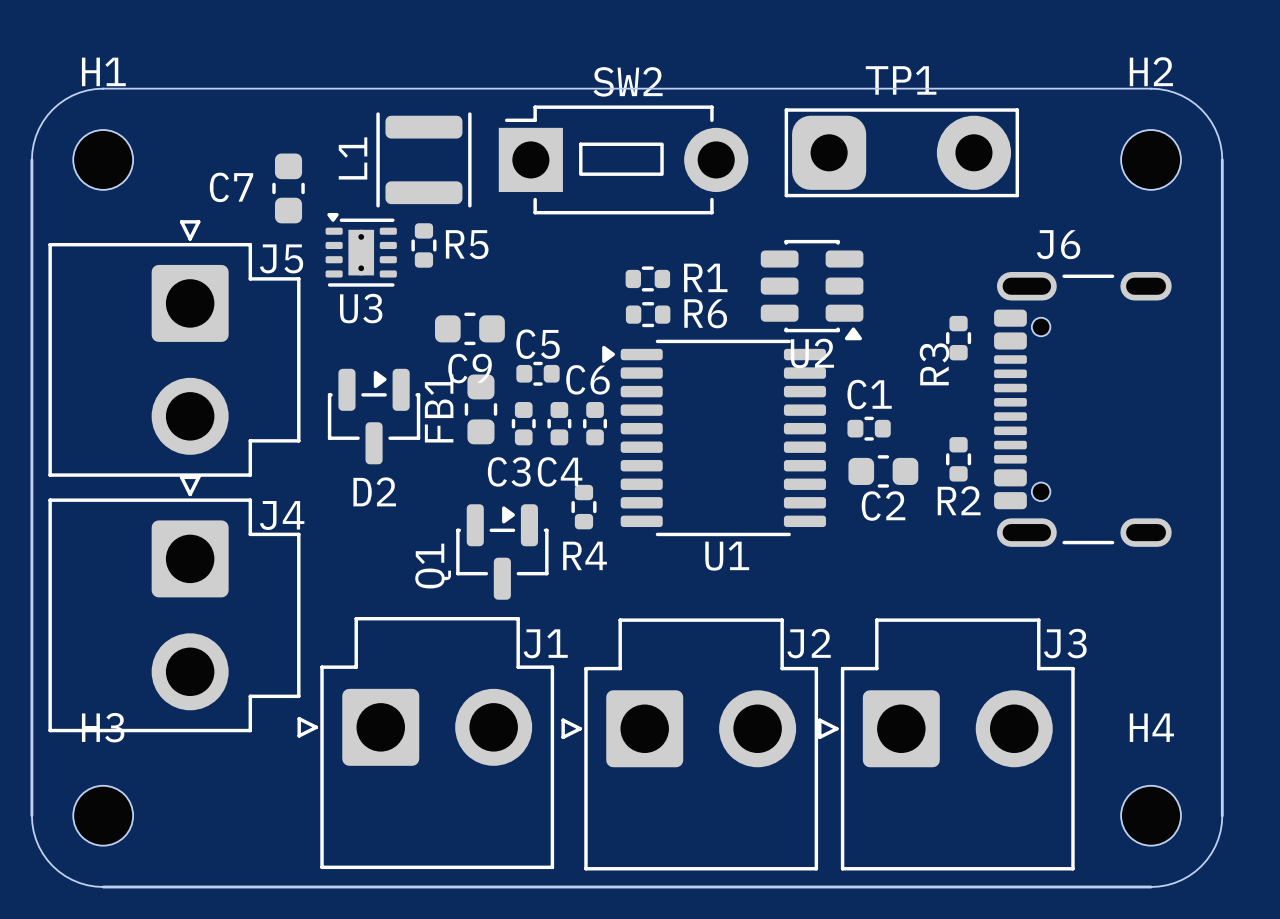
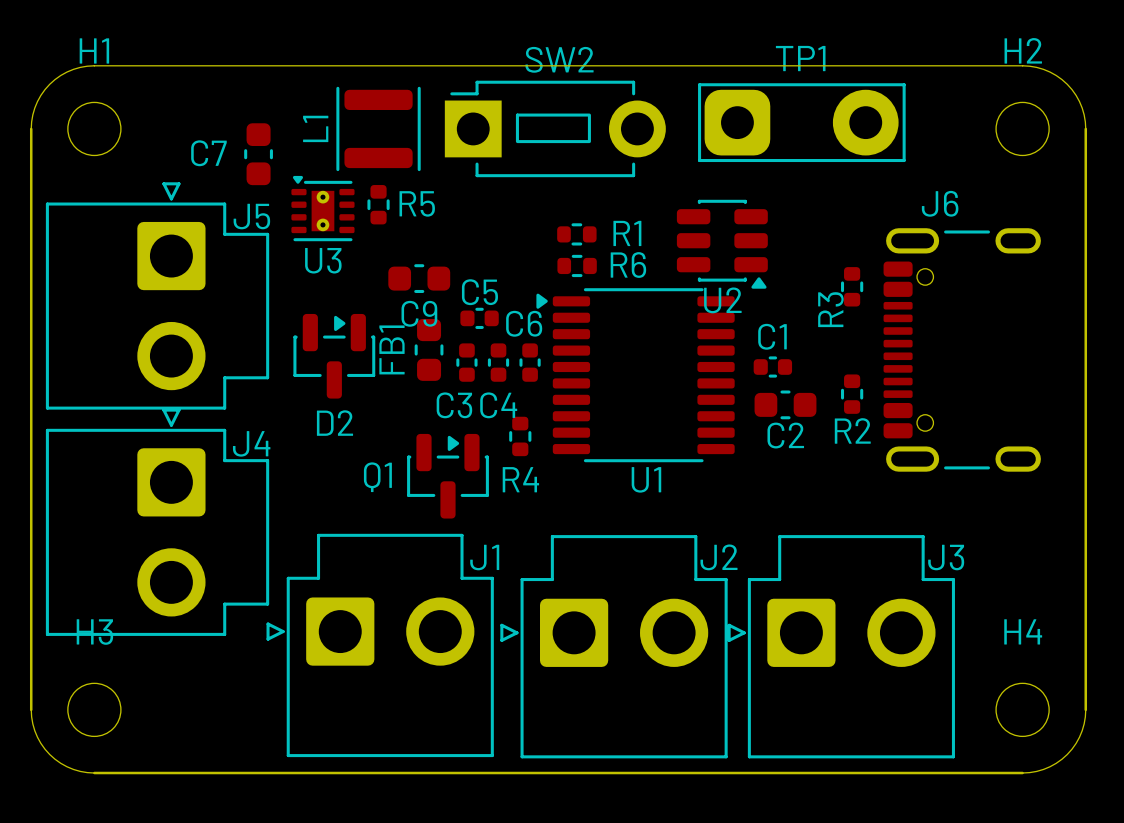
Q1 name rotation: 0° (433, 566) -> 90° clockwise (377, 477)

